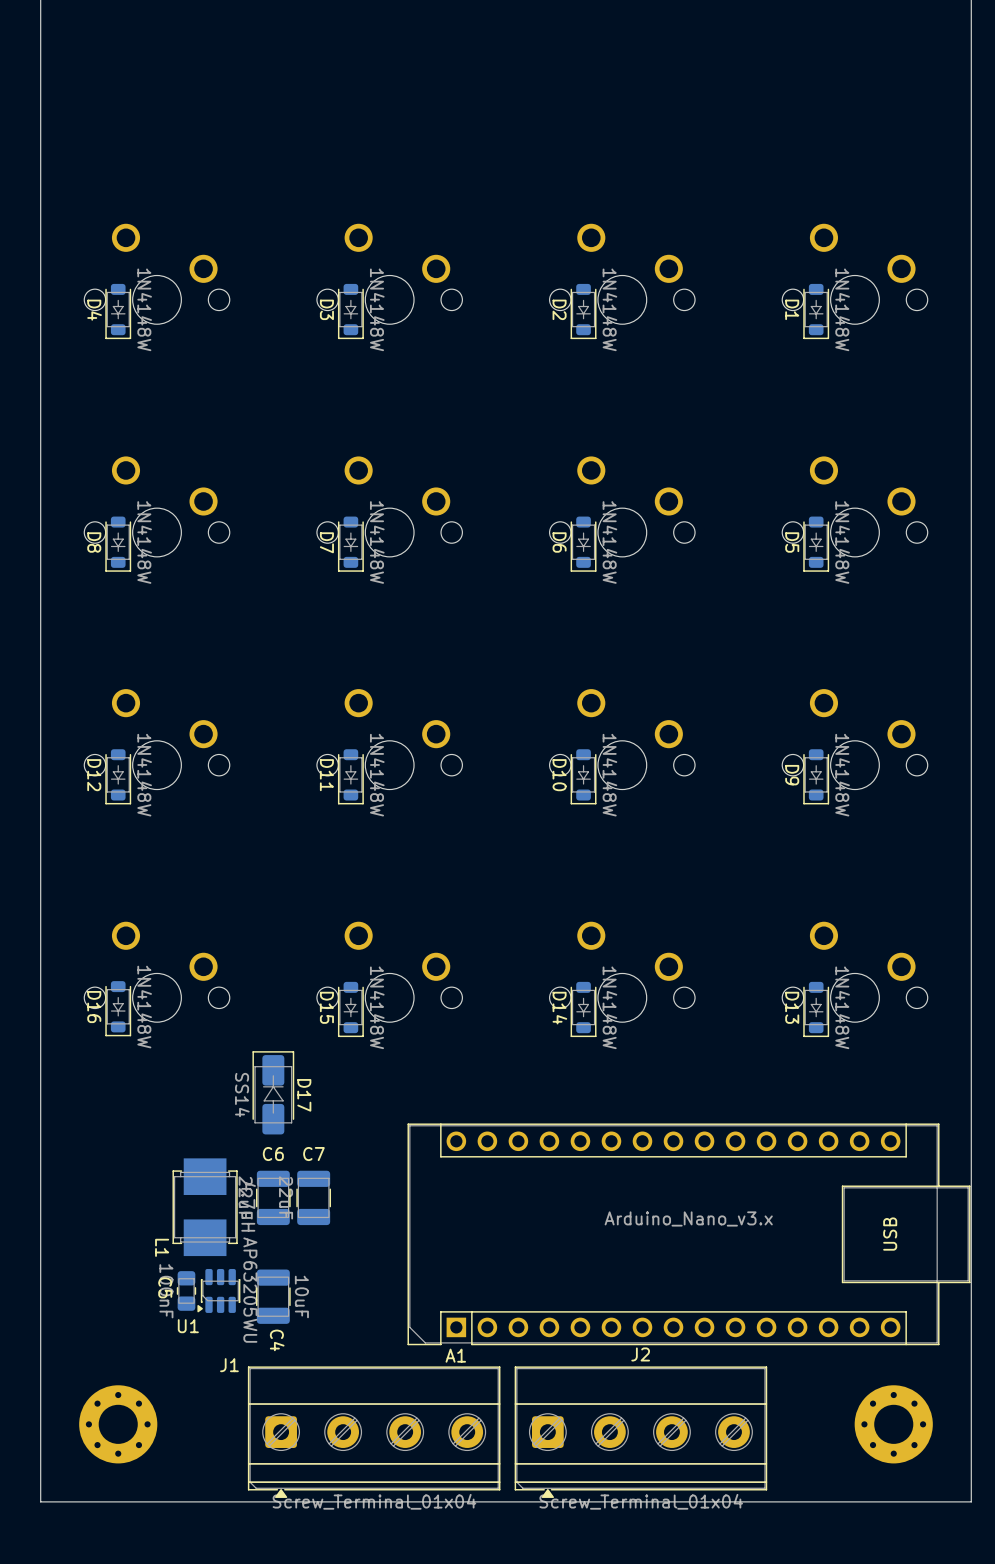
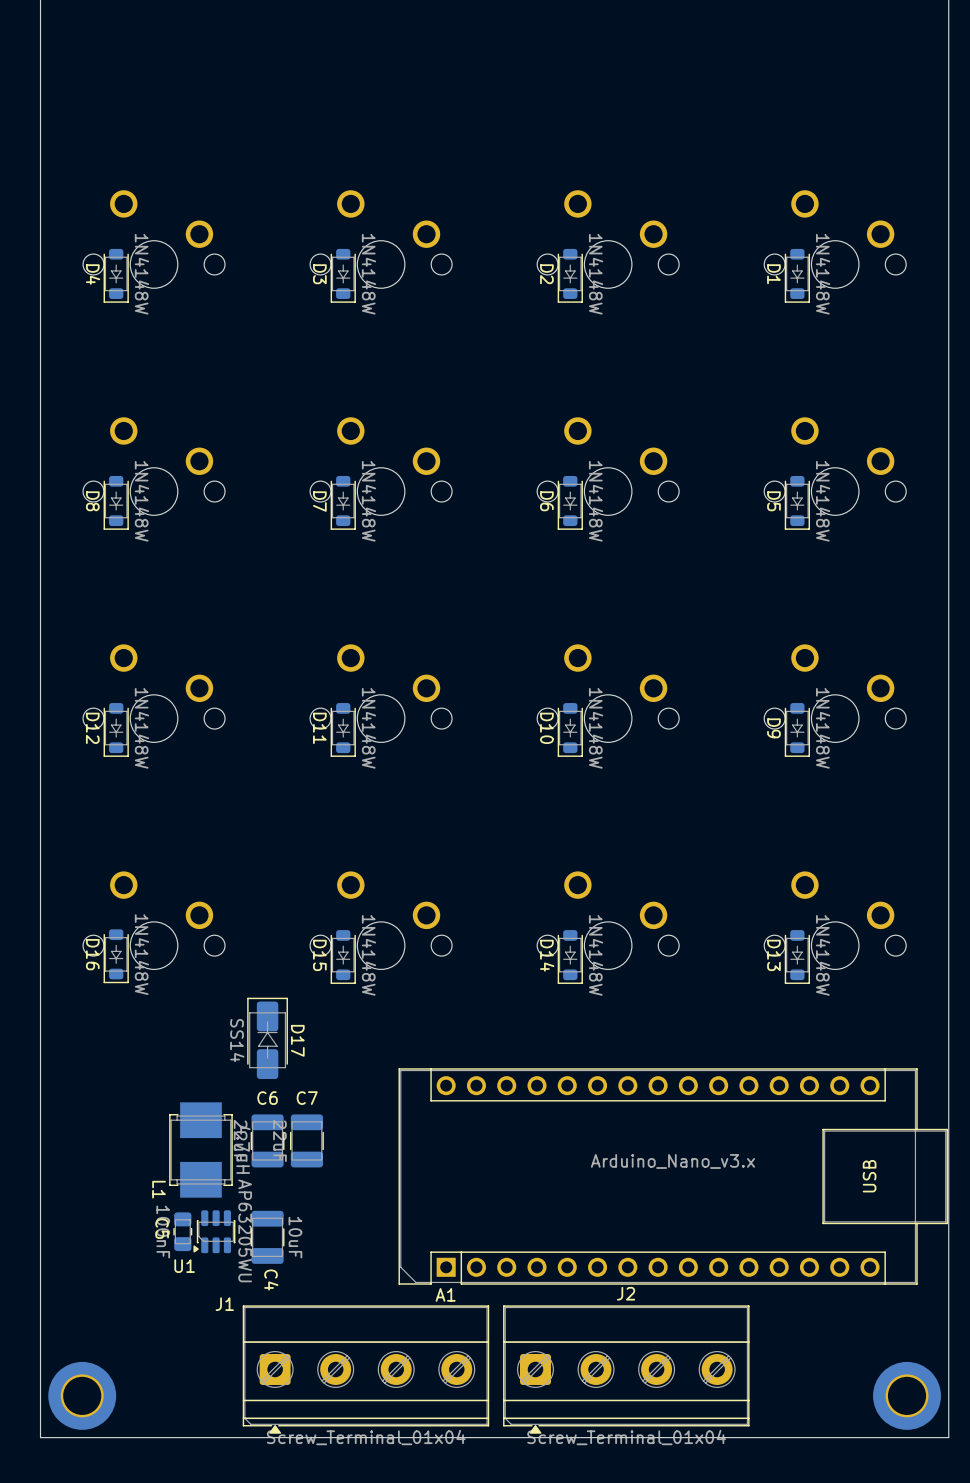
part: (118, 1424) -> none
part: (893, 1424) -> none
part: none -> (82, 1395)
part: none -> (907, 1395)

